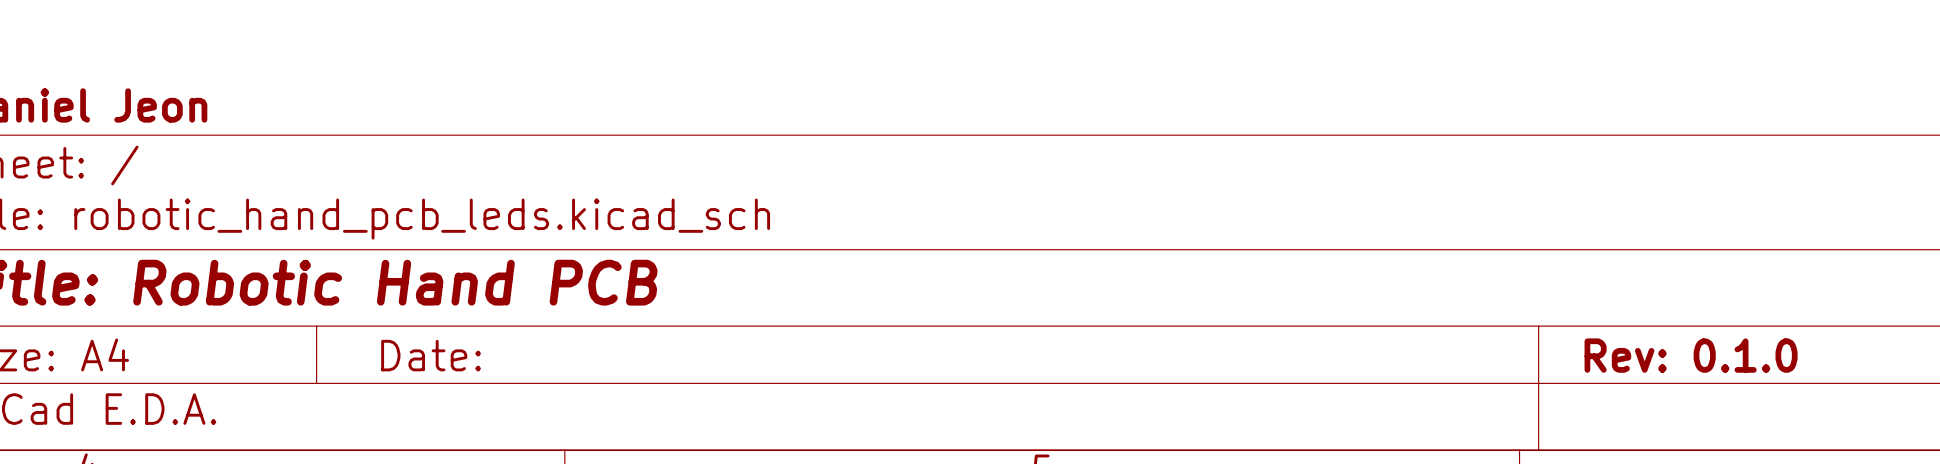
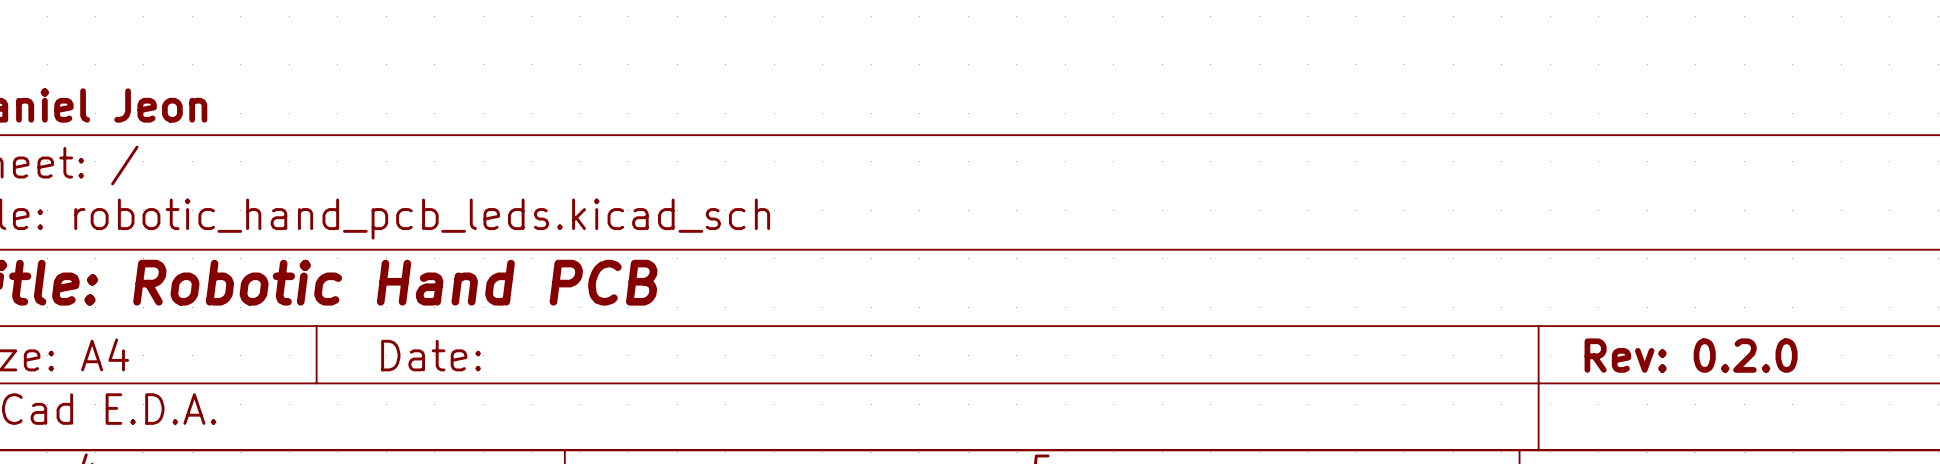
title block: Rev: 0.1.0 (1691, 355) -> Rev: 0.2.0 (1691, 355)

